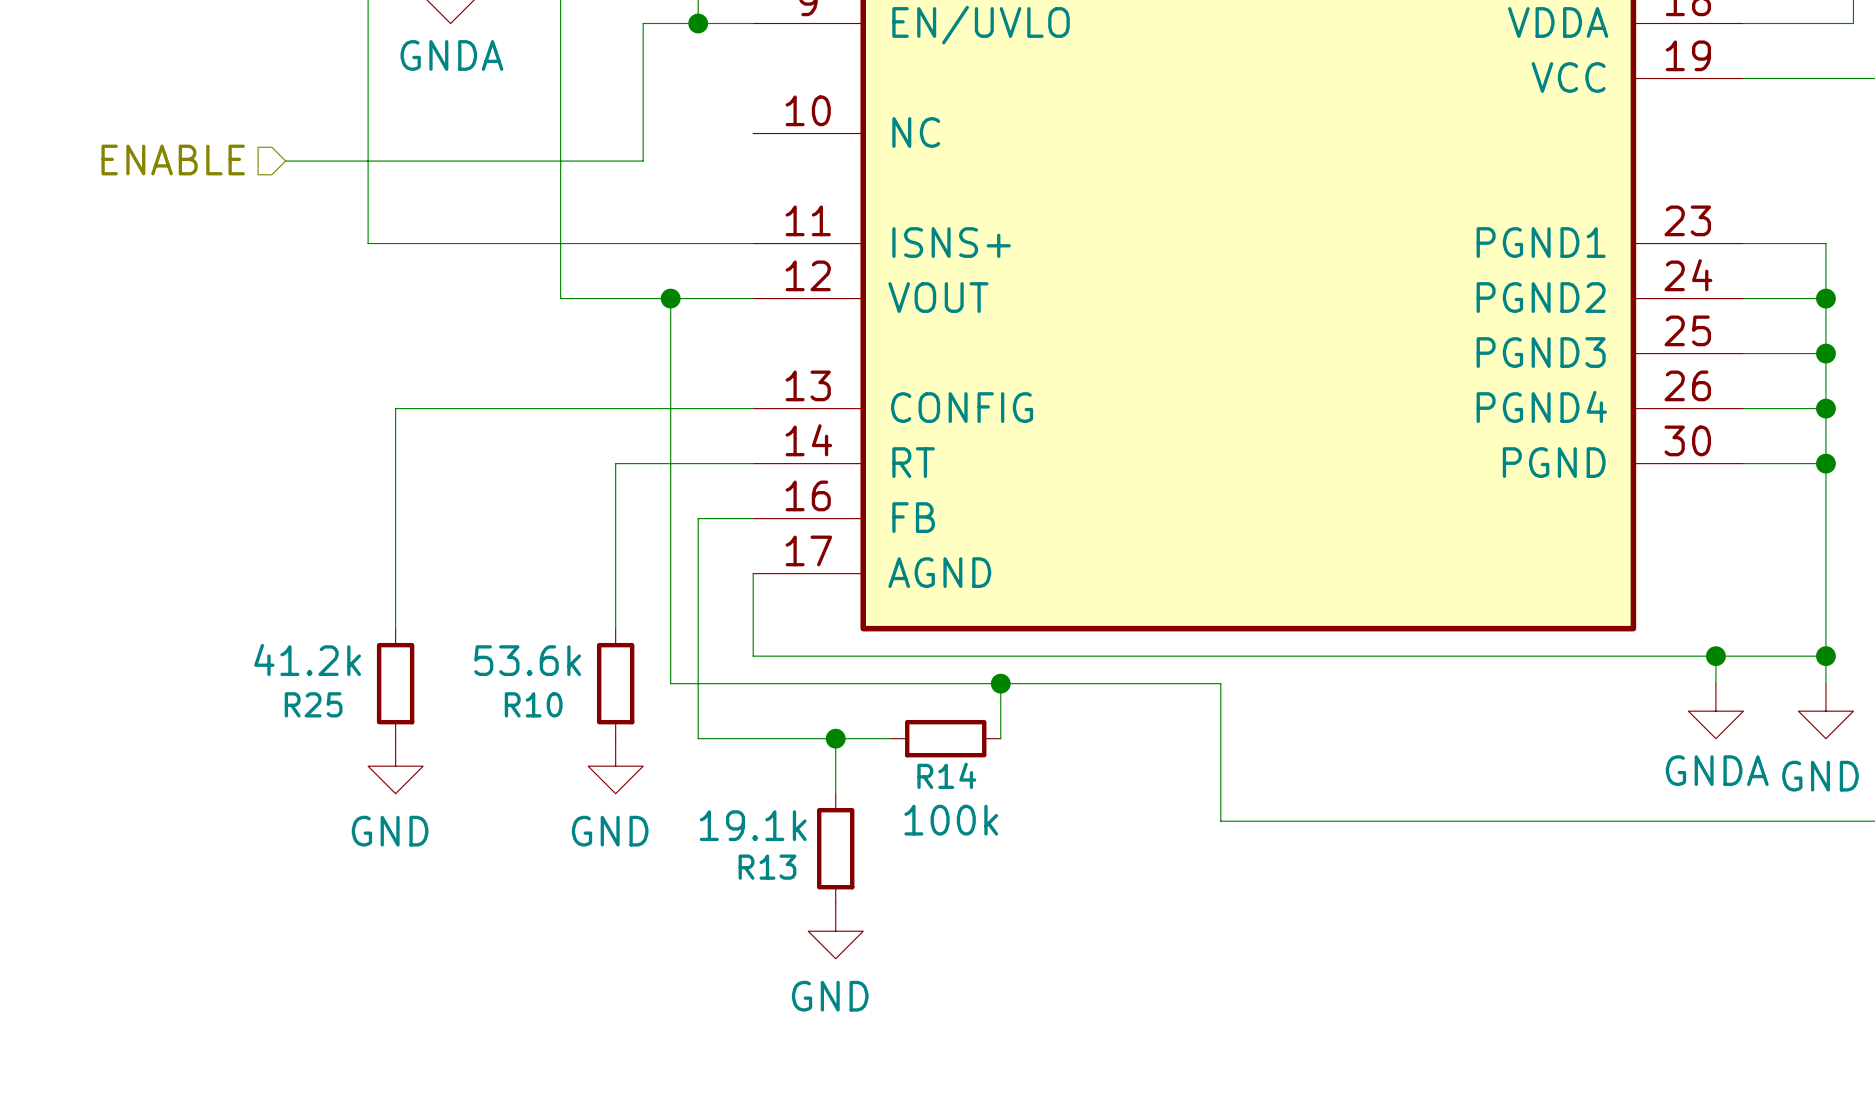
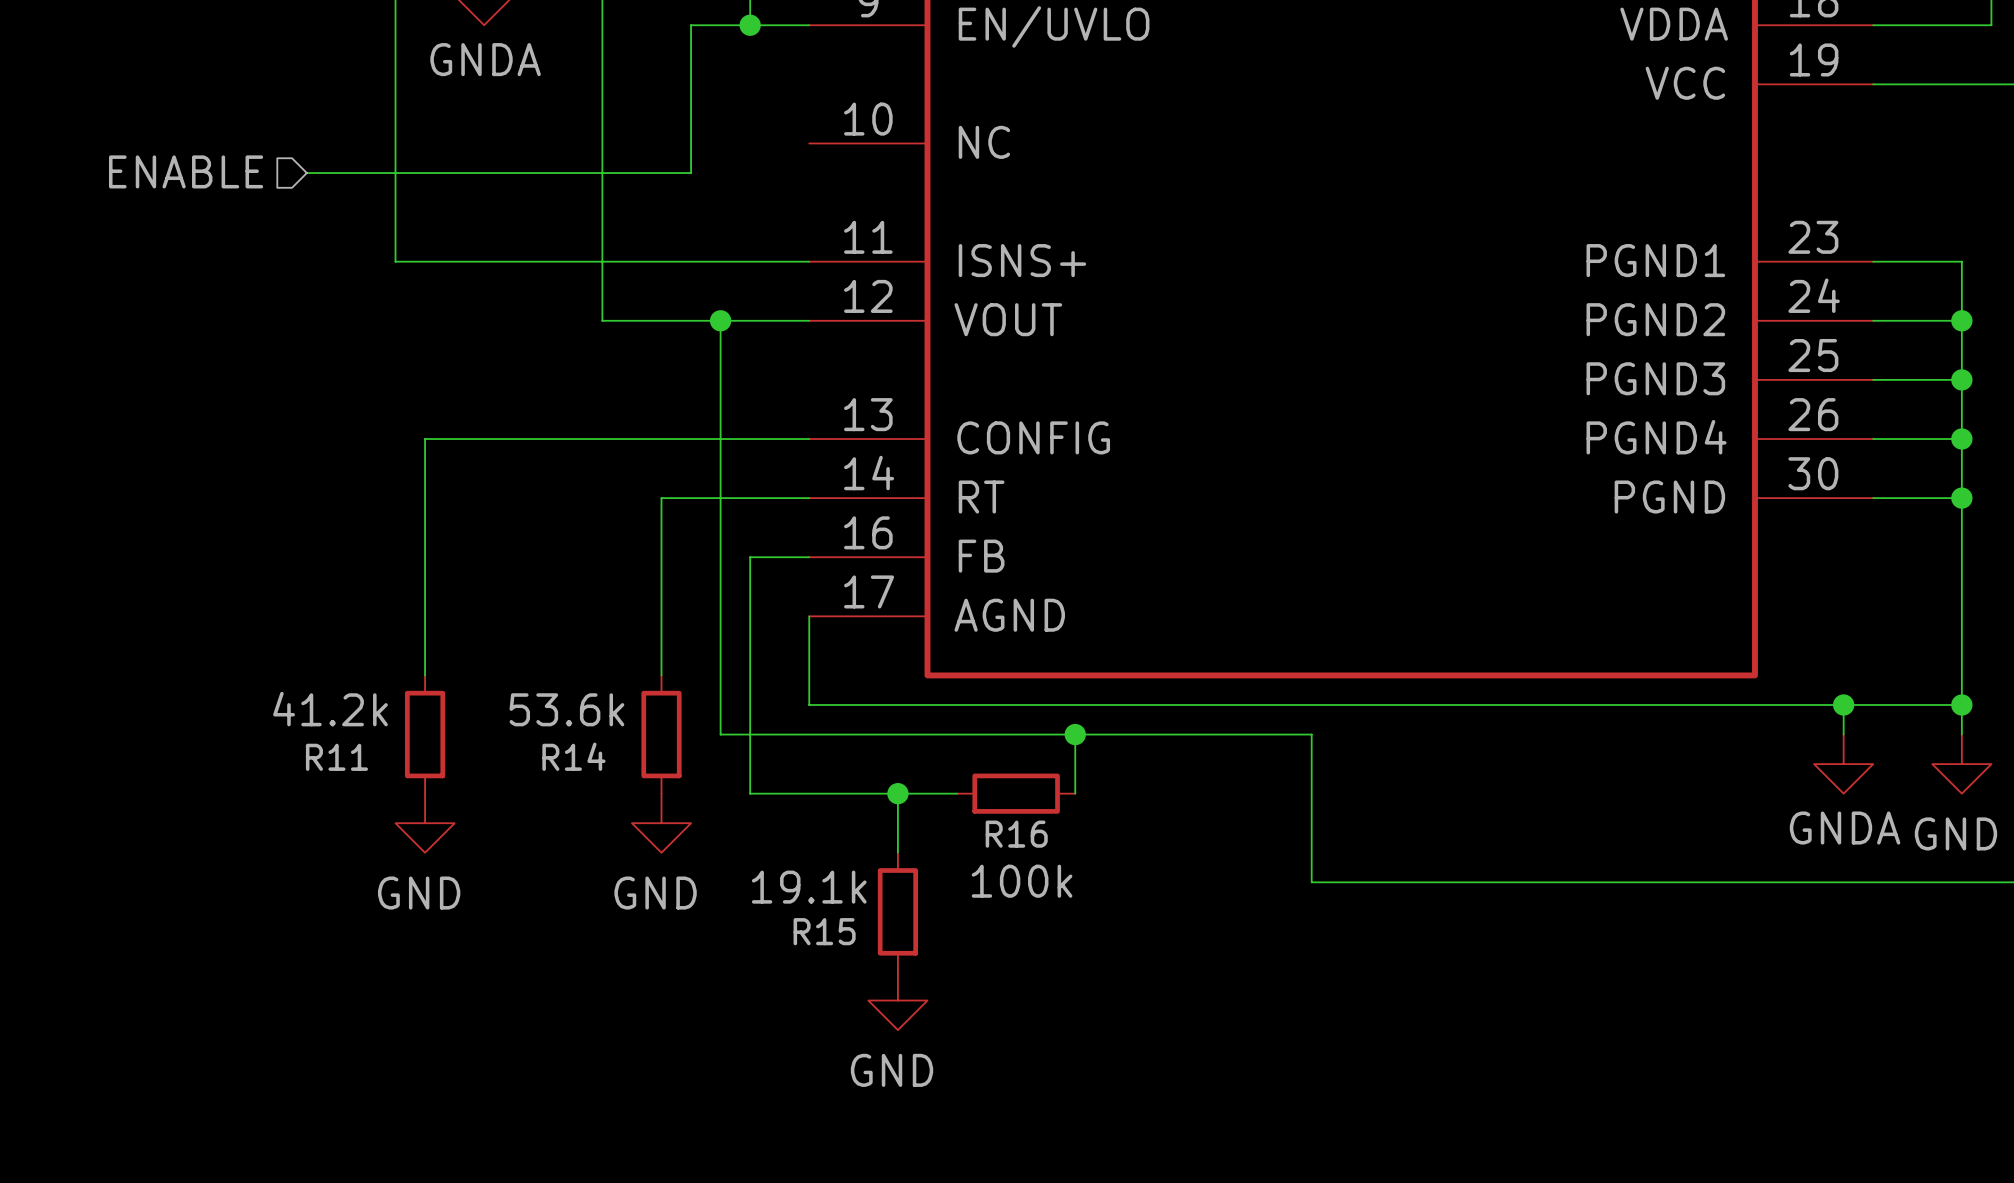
R25 name: R25 (313, 704) -> R11 (336, 757)
R10 name: R10 (533, 704) -> R14 (573, 756)
R14 name: R14 (946, 775) -> R16 (1016, 834)
R13 name: R13 (767, 867) -> R15 (824, 931)

